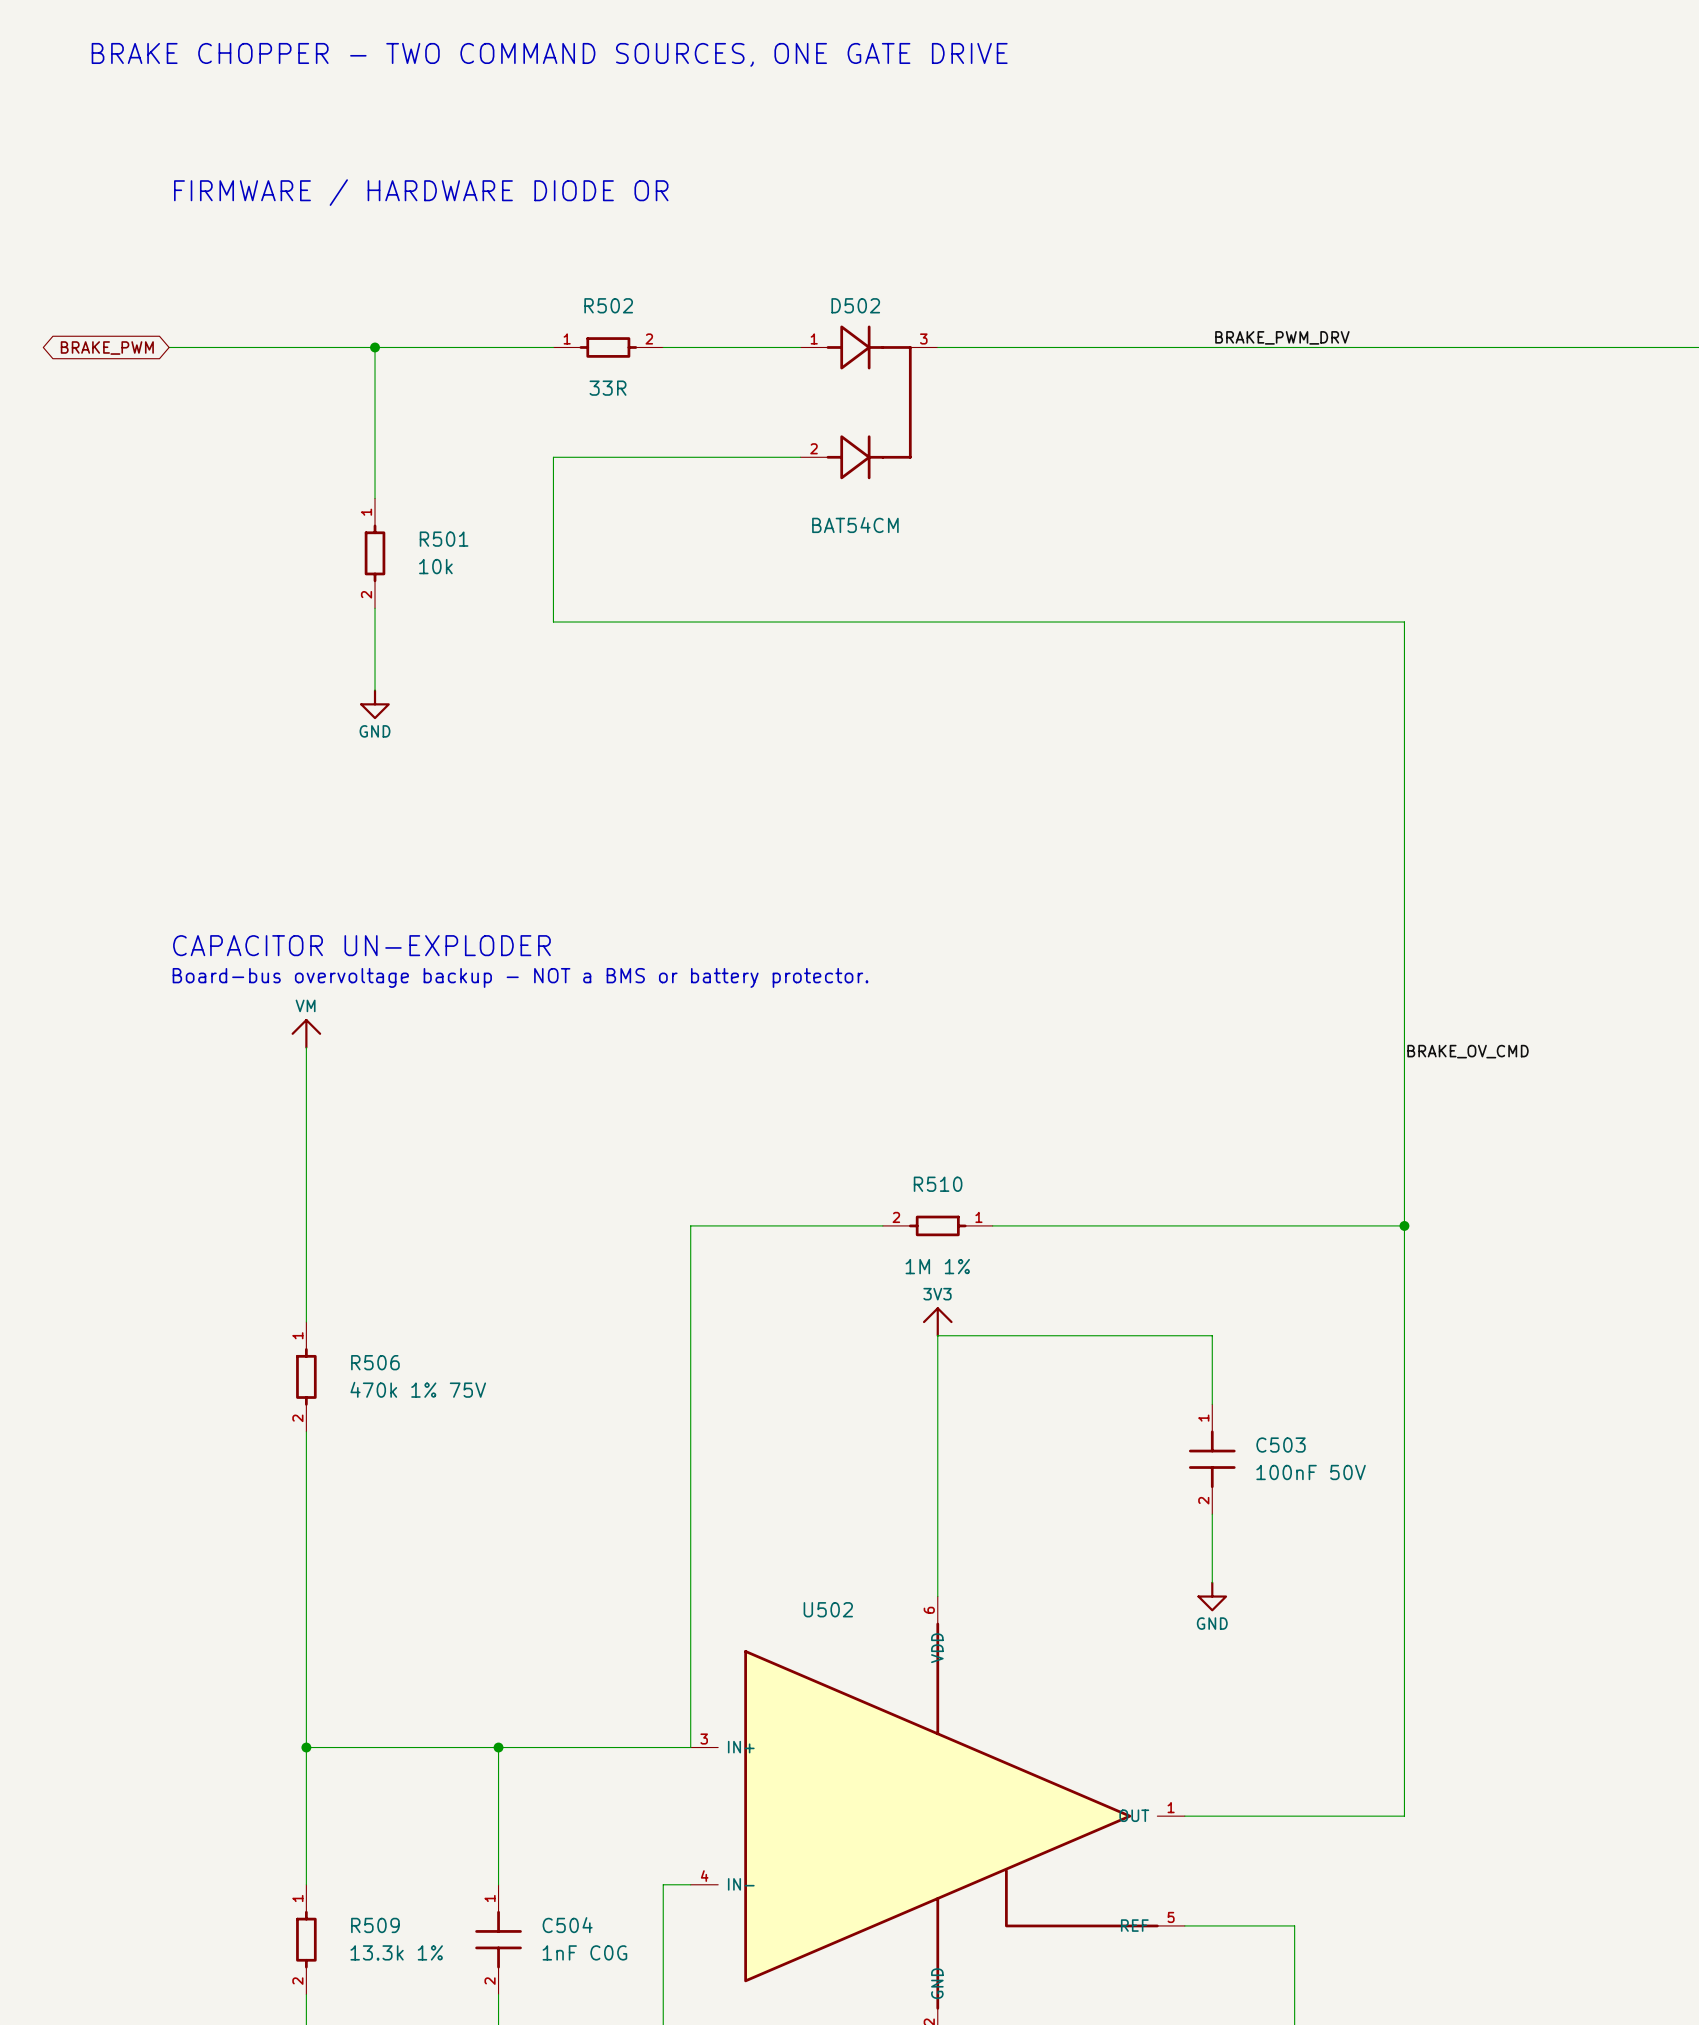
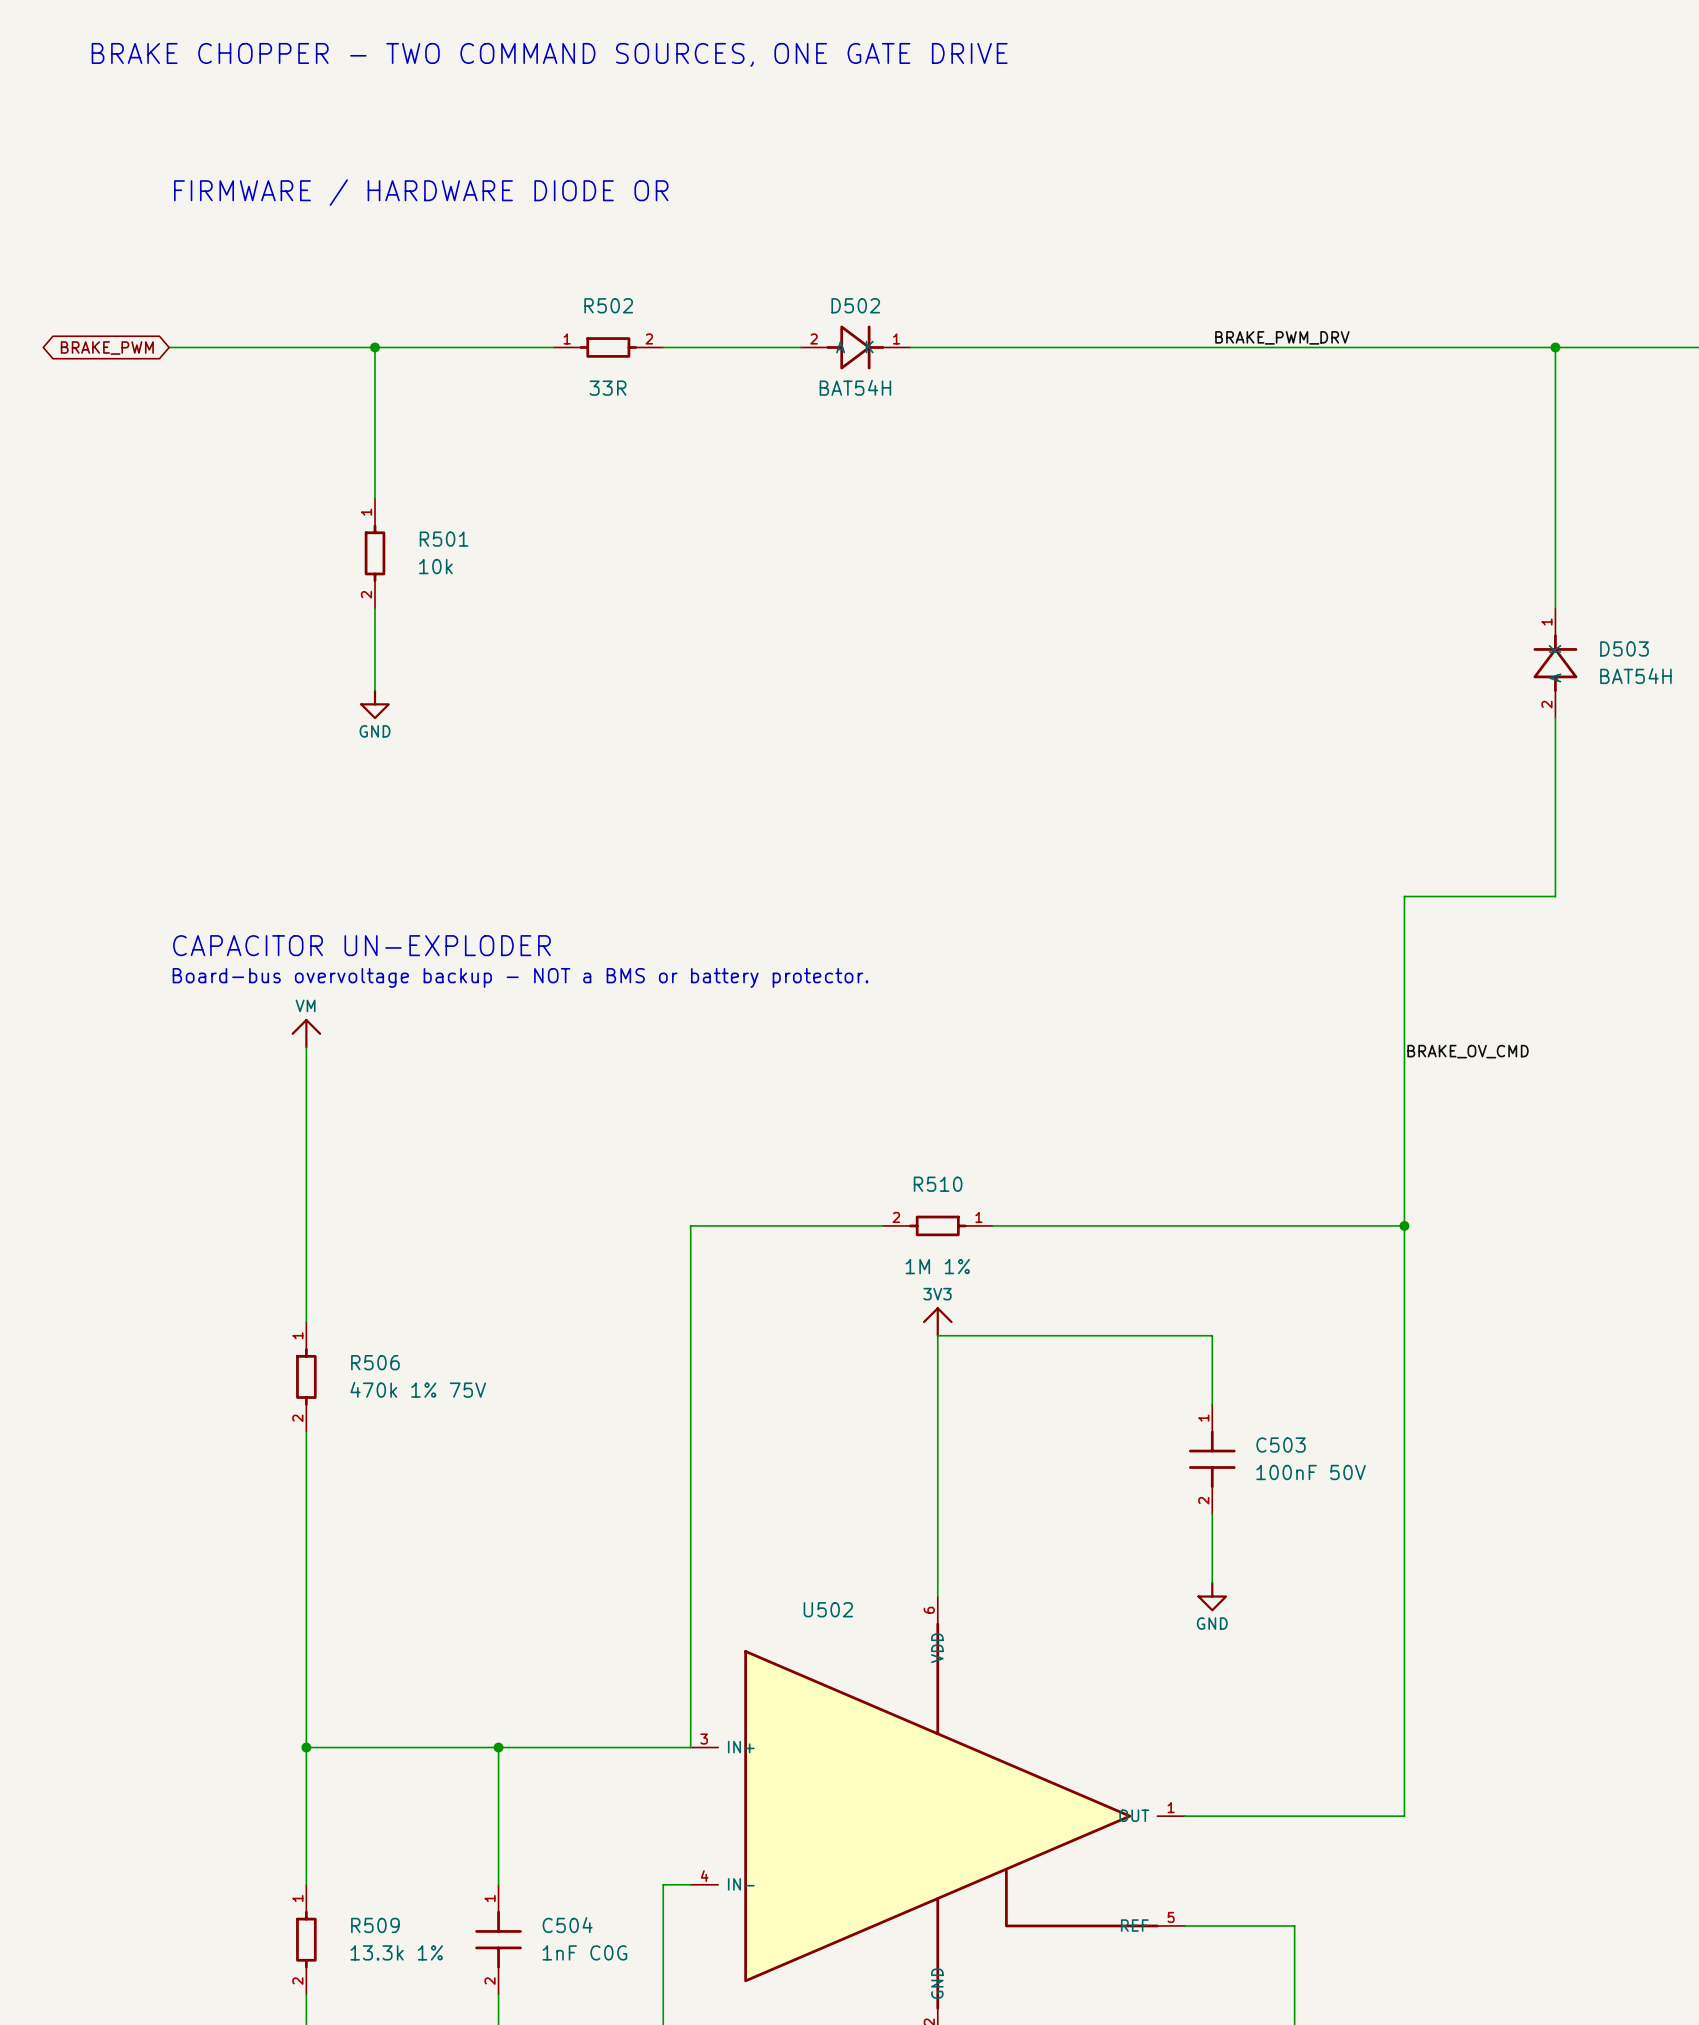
D502 symbol: [800, 325, 938, 480] -> [800, 325, 911, 370]
wire: none -> (1555, 347) (1555, 608)
junction: none -> (1555, 347)
wire: (800, 457) (553, 457) (553, 622) (1404, 622) (1404, 896) -> (1555, 718) (1555, 896) (1404, 896)
D502 value: BAT54CM (855, 525) -> BAT54H (855, 387)
D503: none -> BAT54H (1555, 663)

